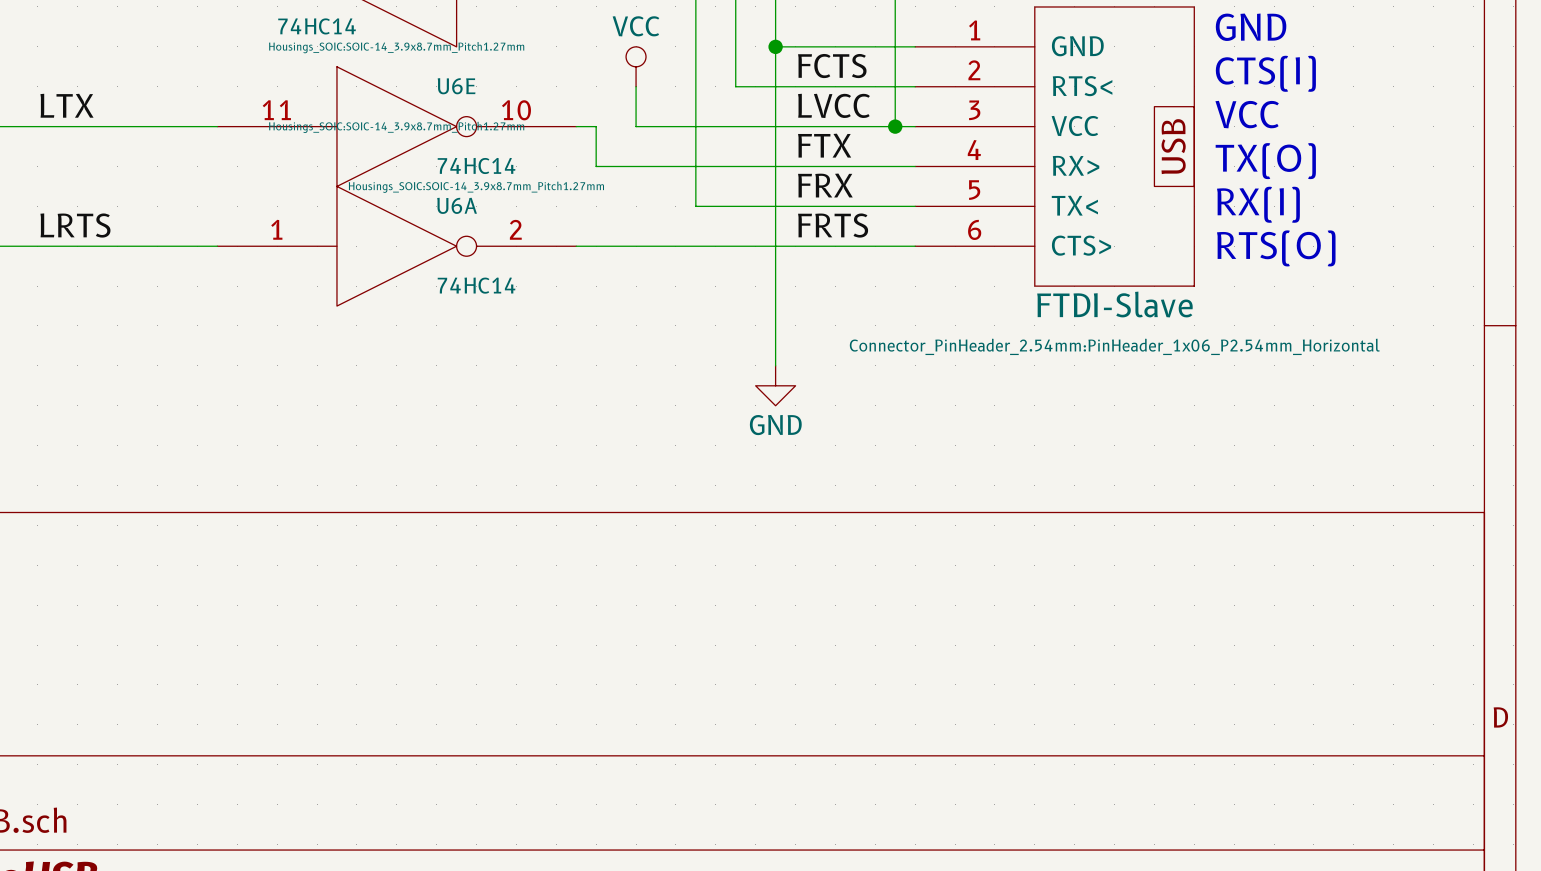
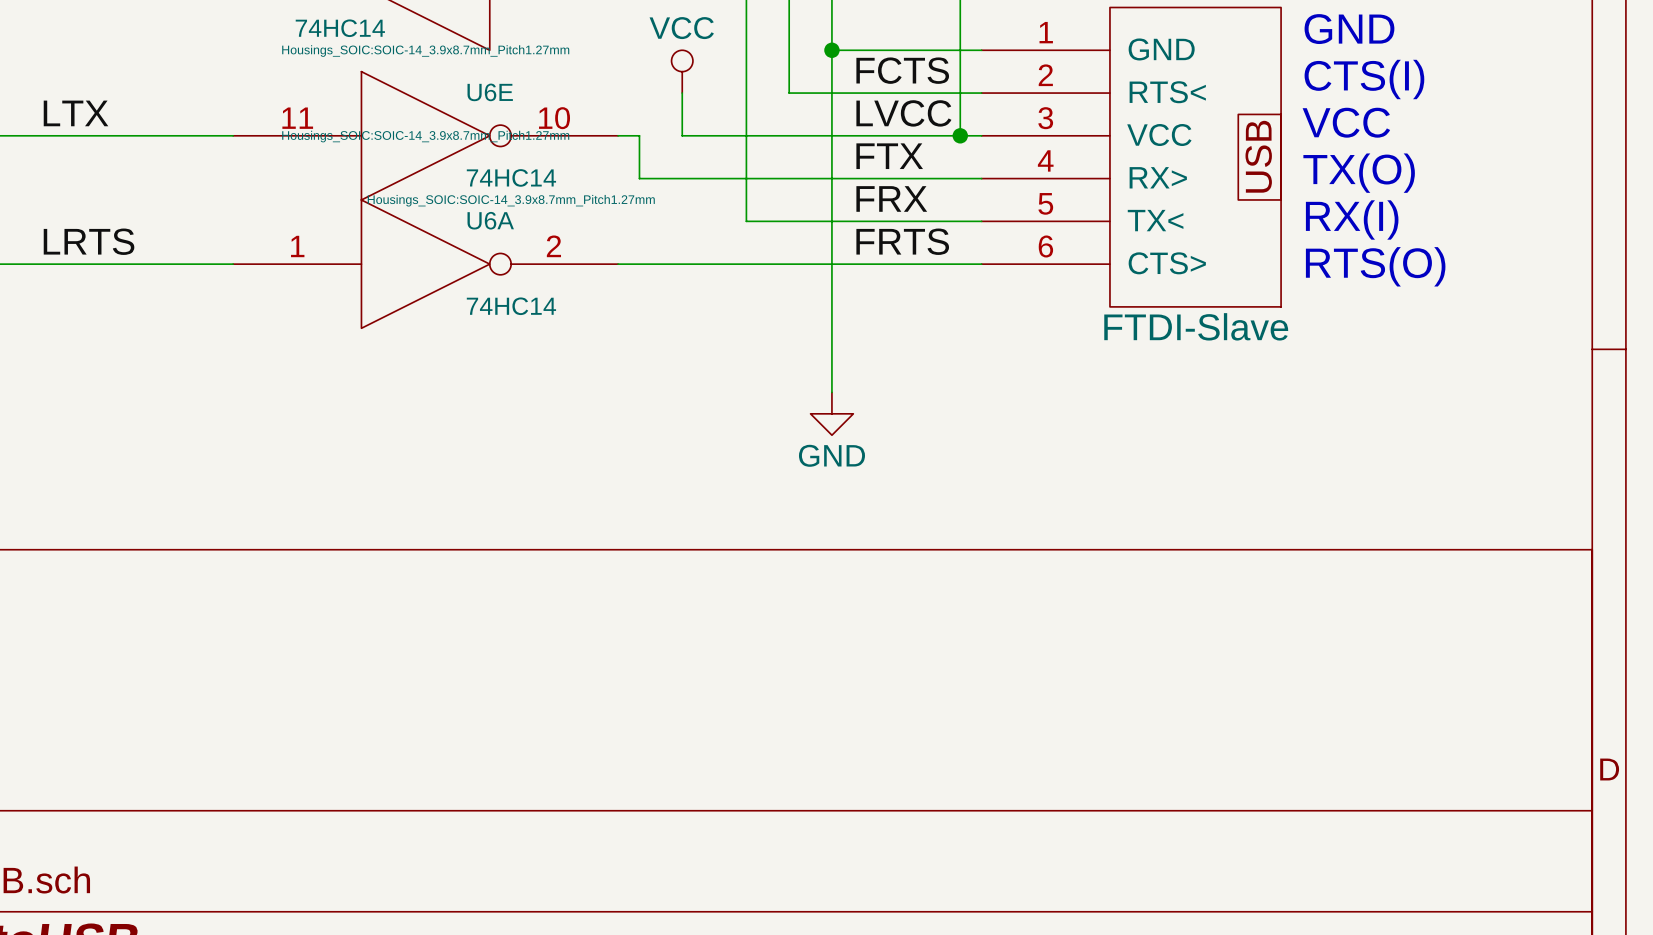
part text: Connector_PinHeader_2.54mm:PinHeader_1x06_P2.54mm_Horizontal (1114, 346) -> none

